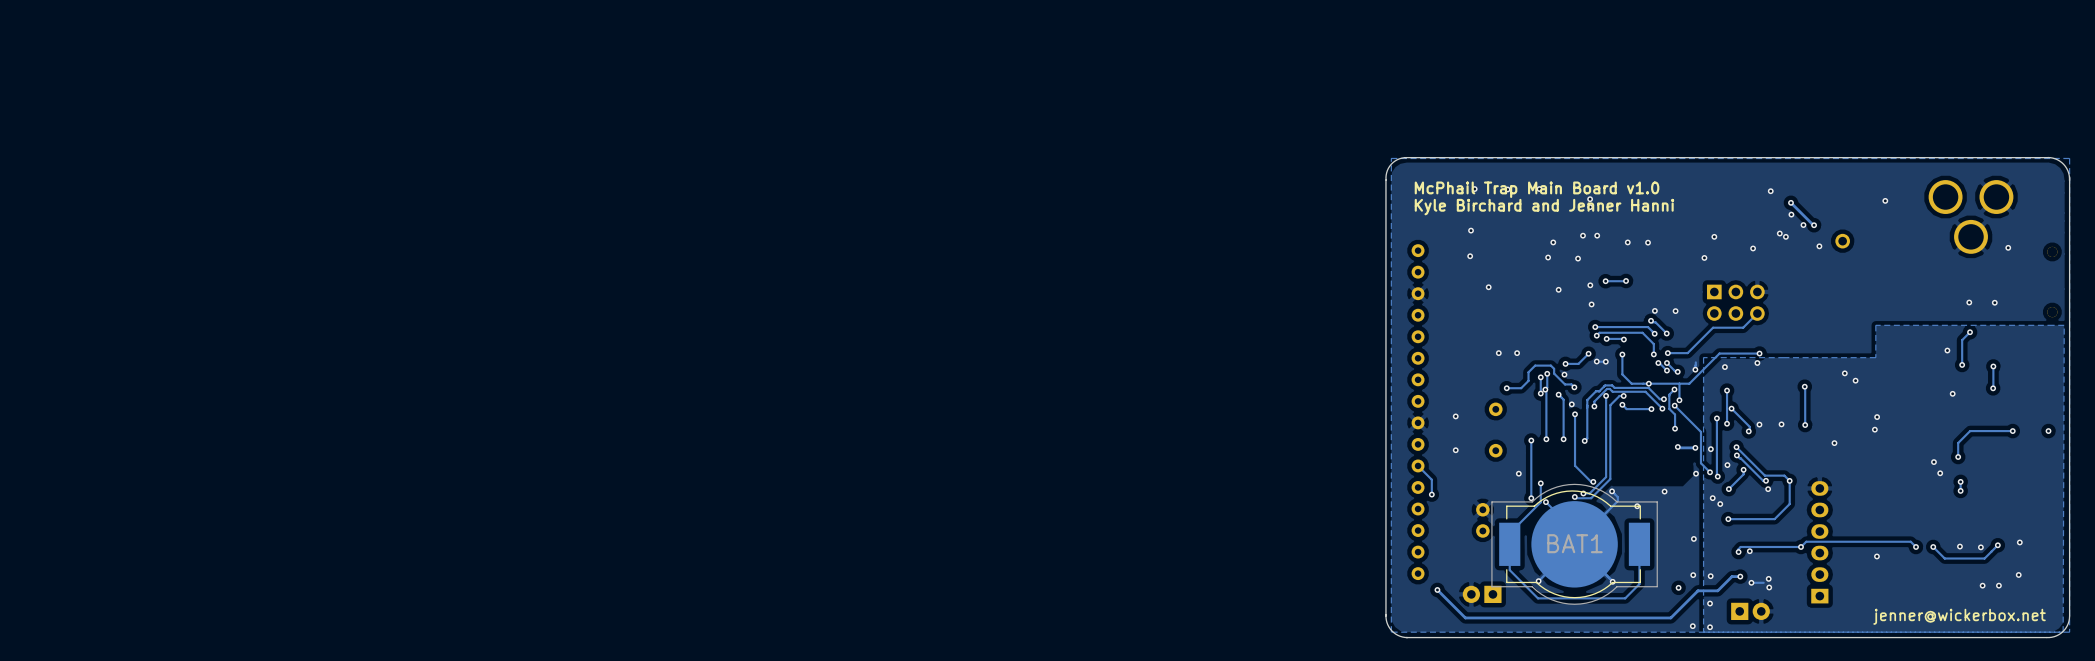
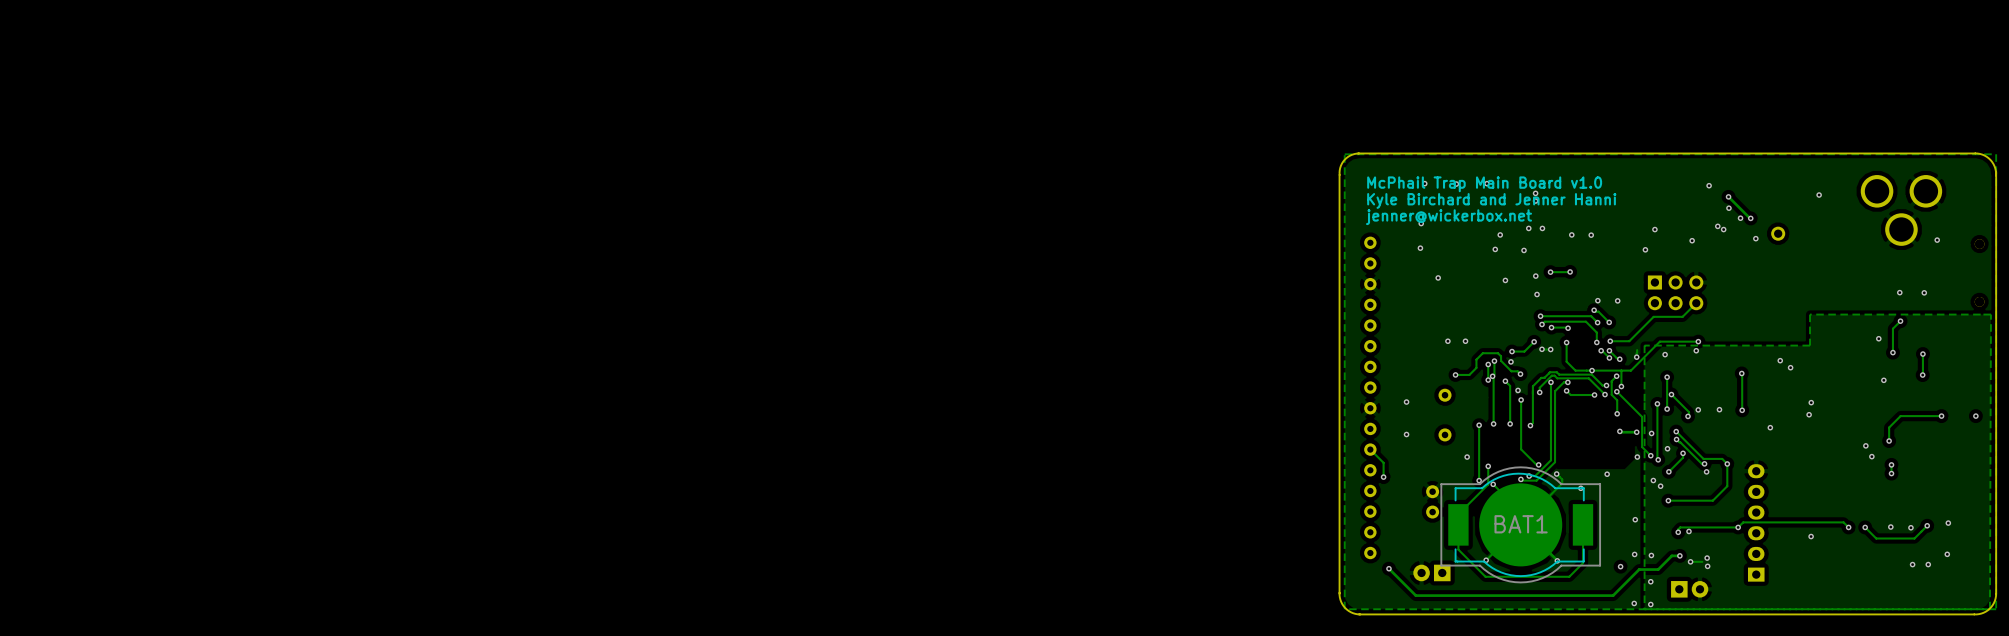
text: none -> jenner@wickerbox.net (1449, 217)
text: jenner@wickerbox.net (1959, 616) -> none

